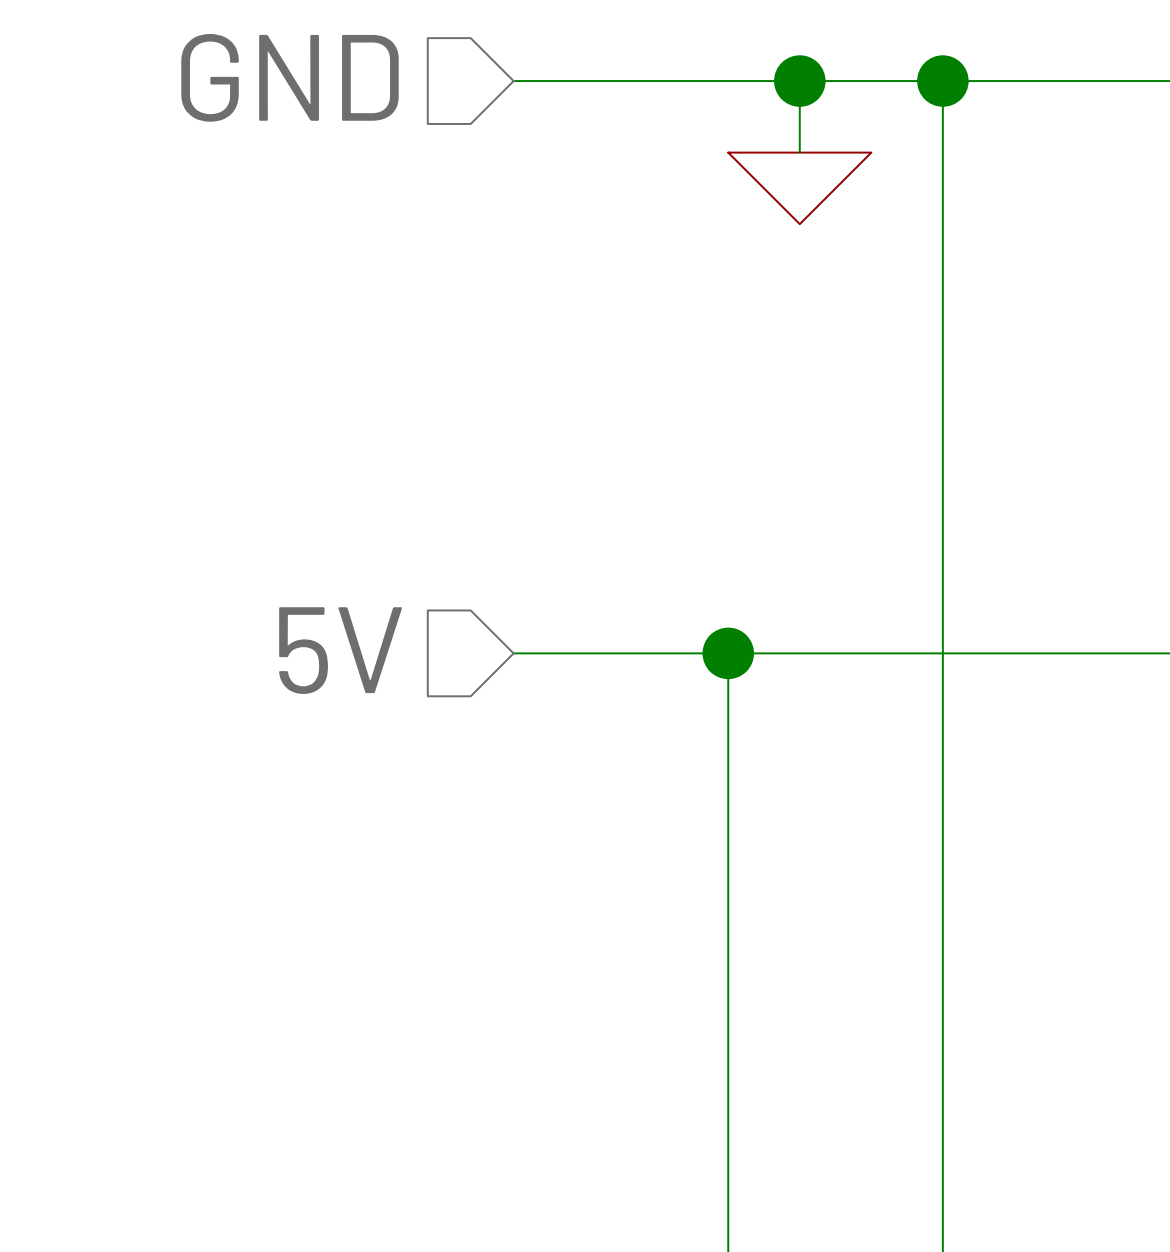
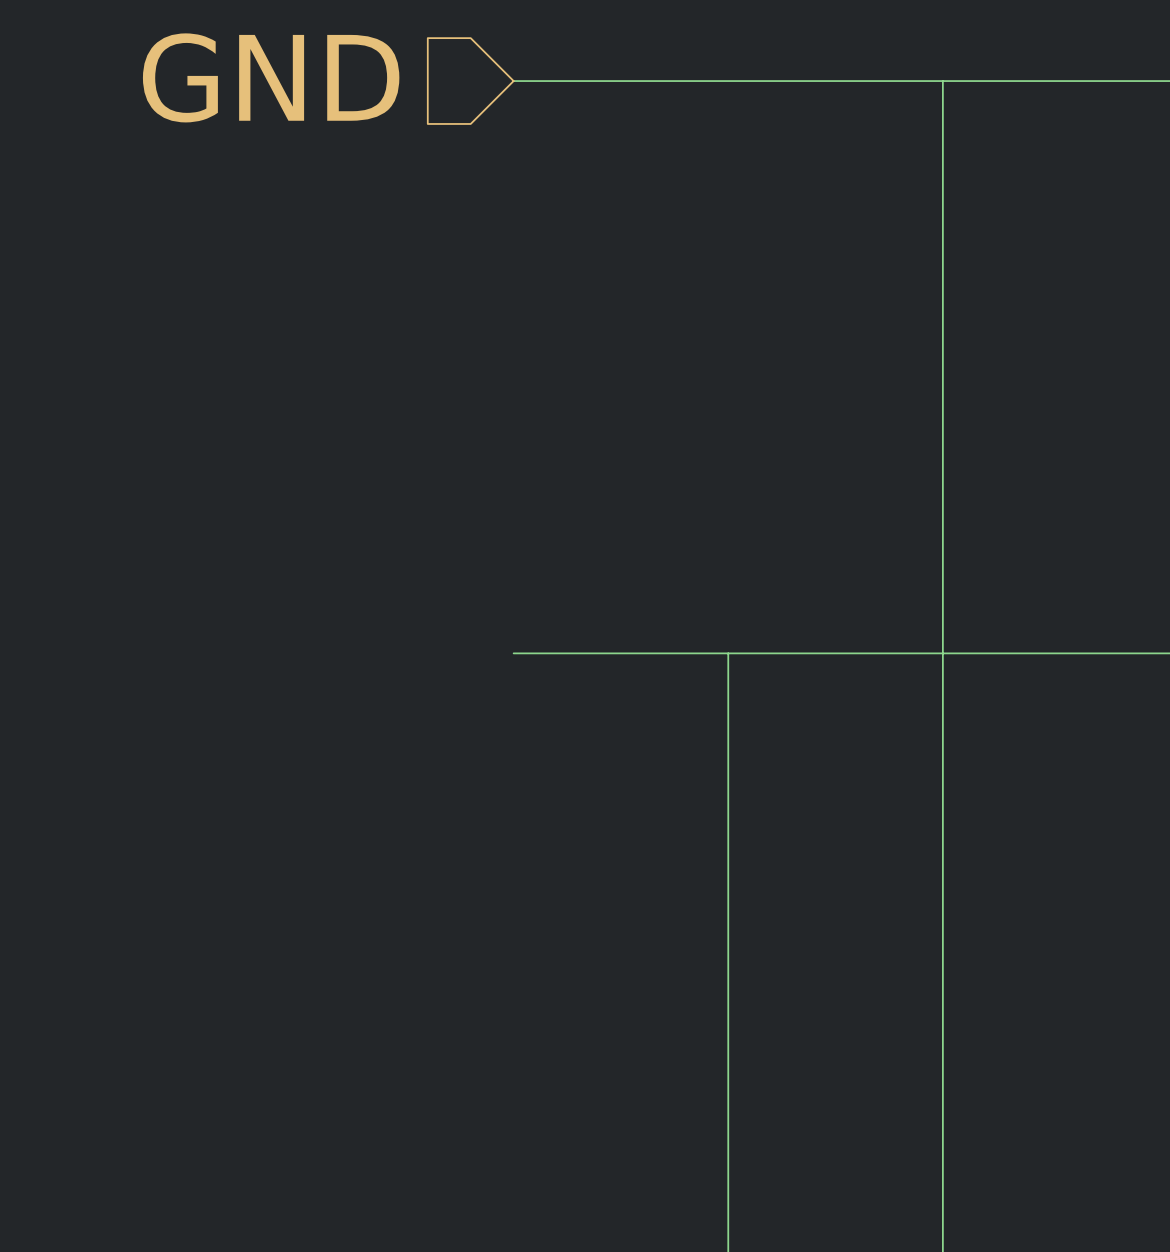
wire: (799, 81) (799, 152) -> none
junction: (799, 81) -> none
junction: (942, 81) -> none
power symbol: (799, 188) -> none
hierarchical label: 5V (340, 650) -> none
junction: (728, 653) -> none

